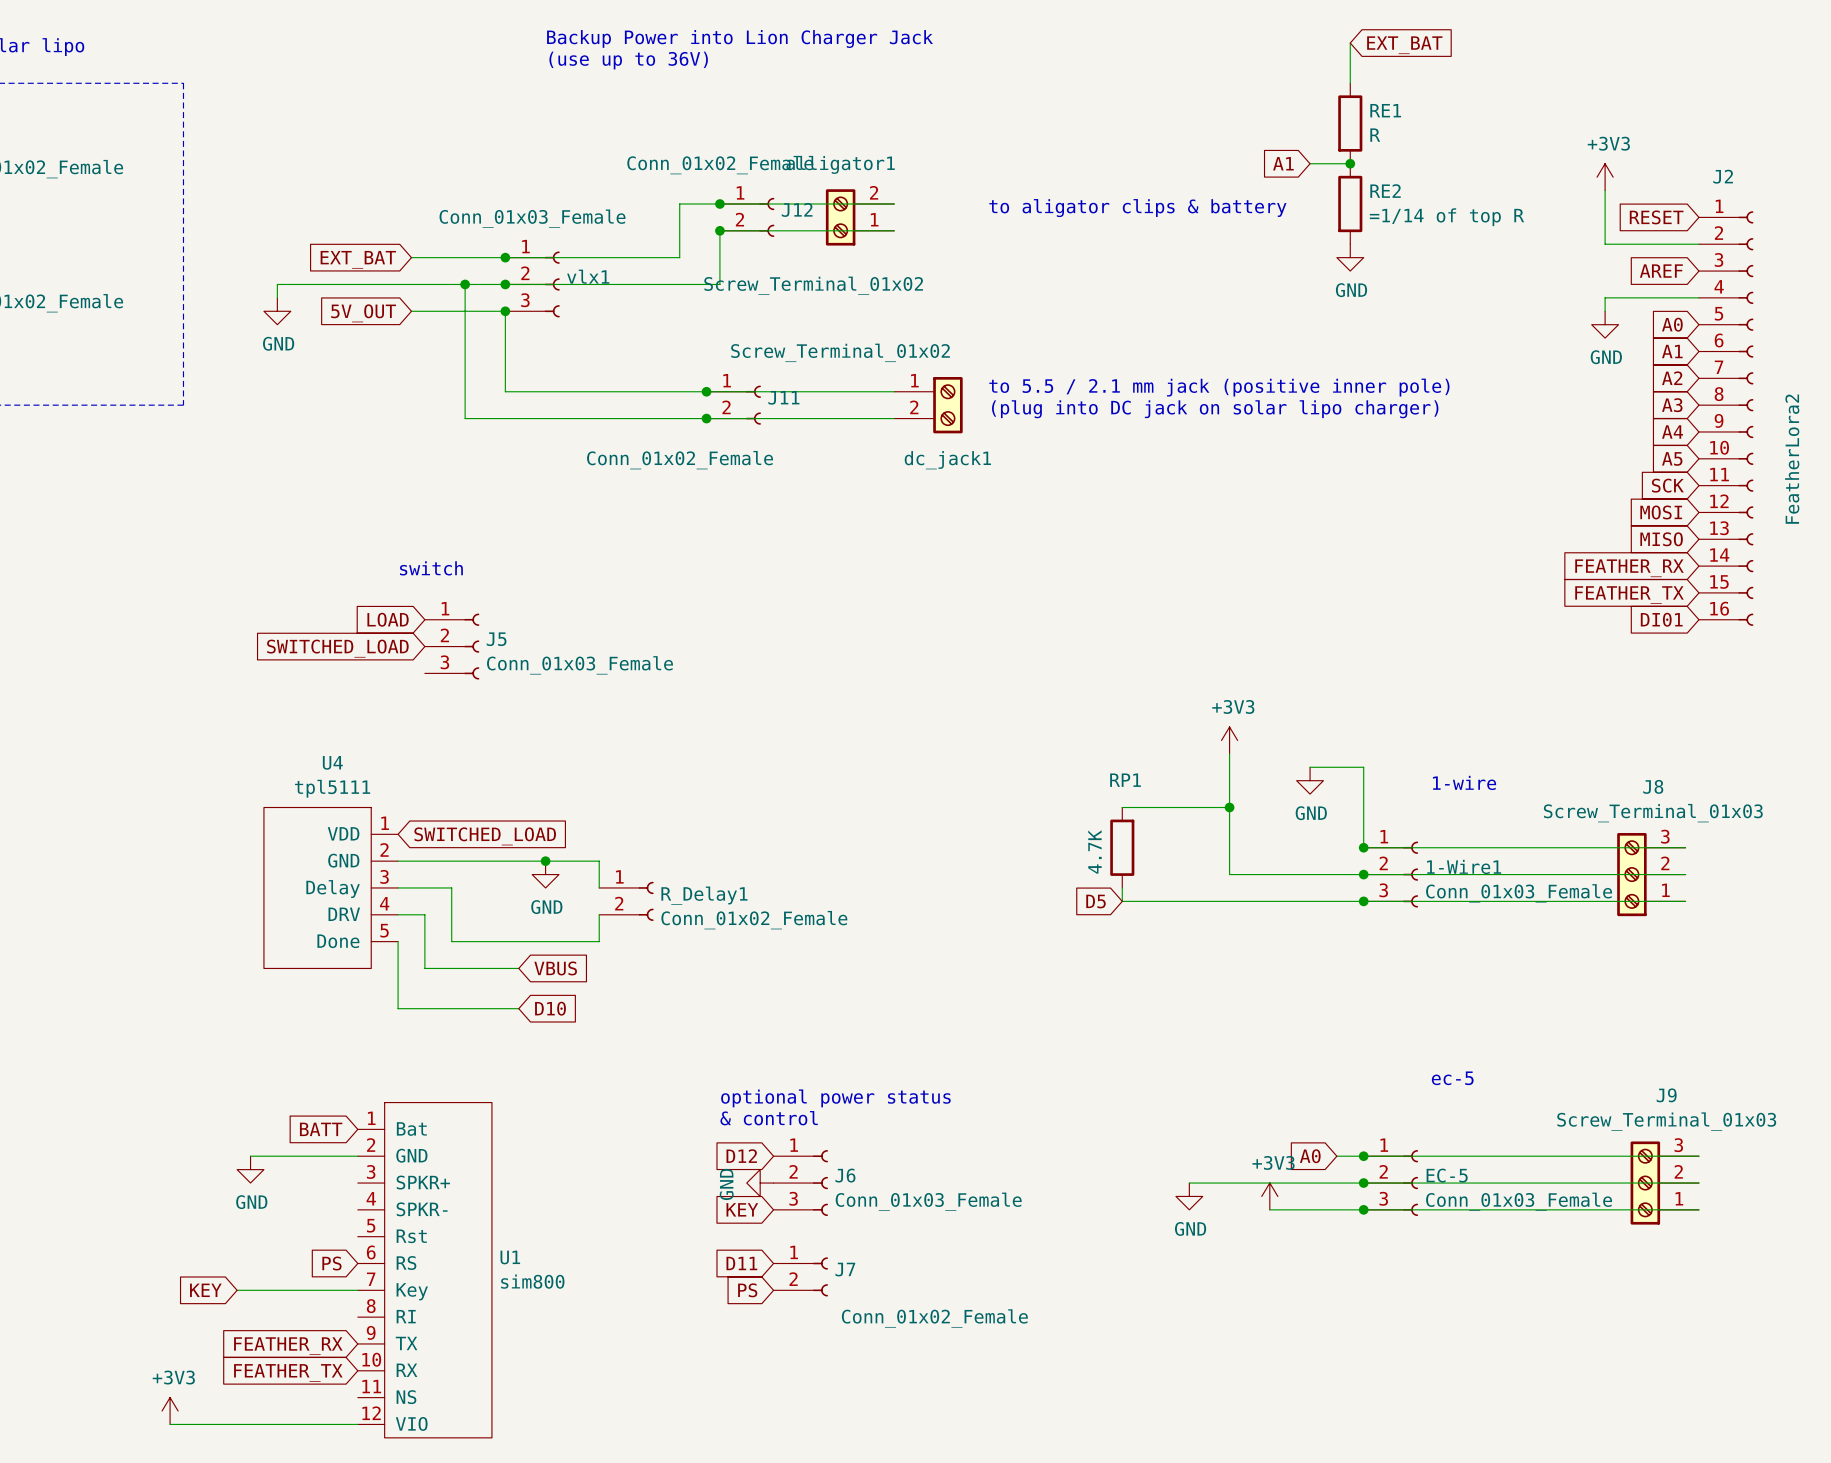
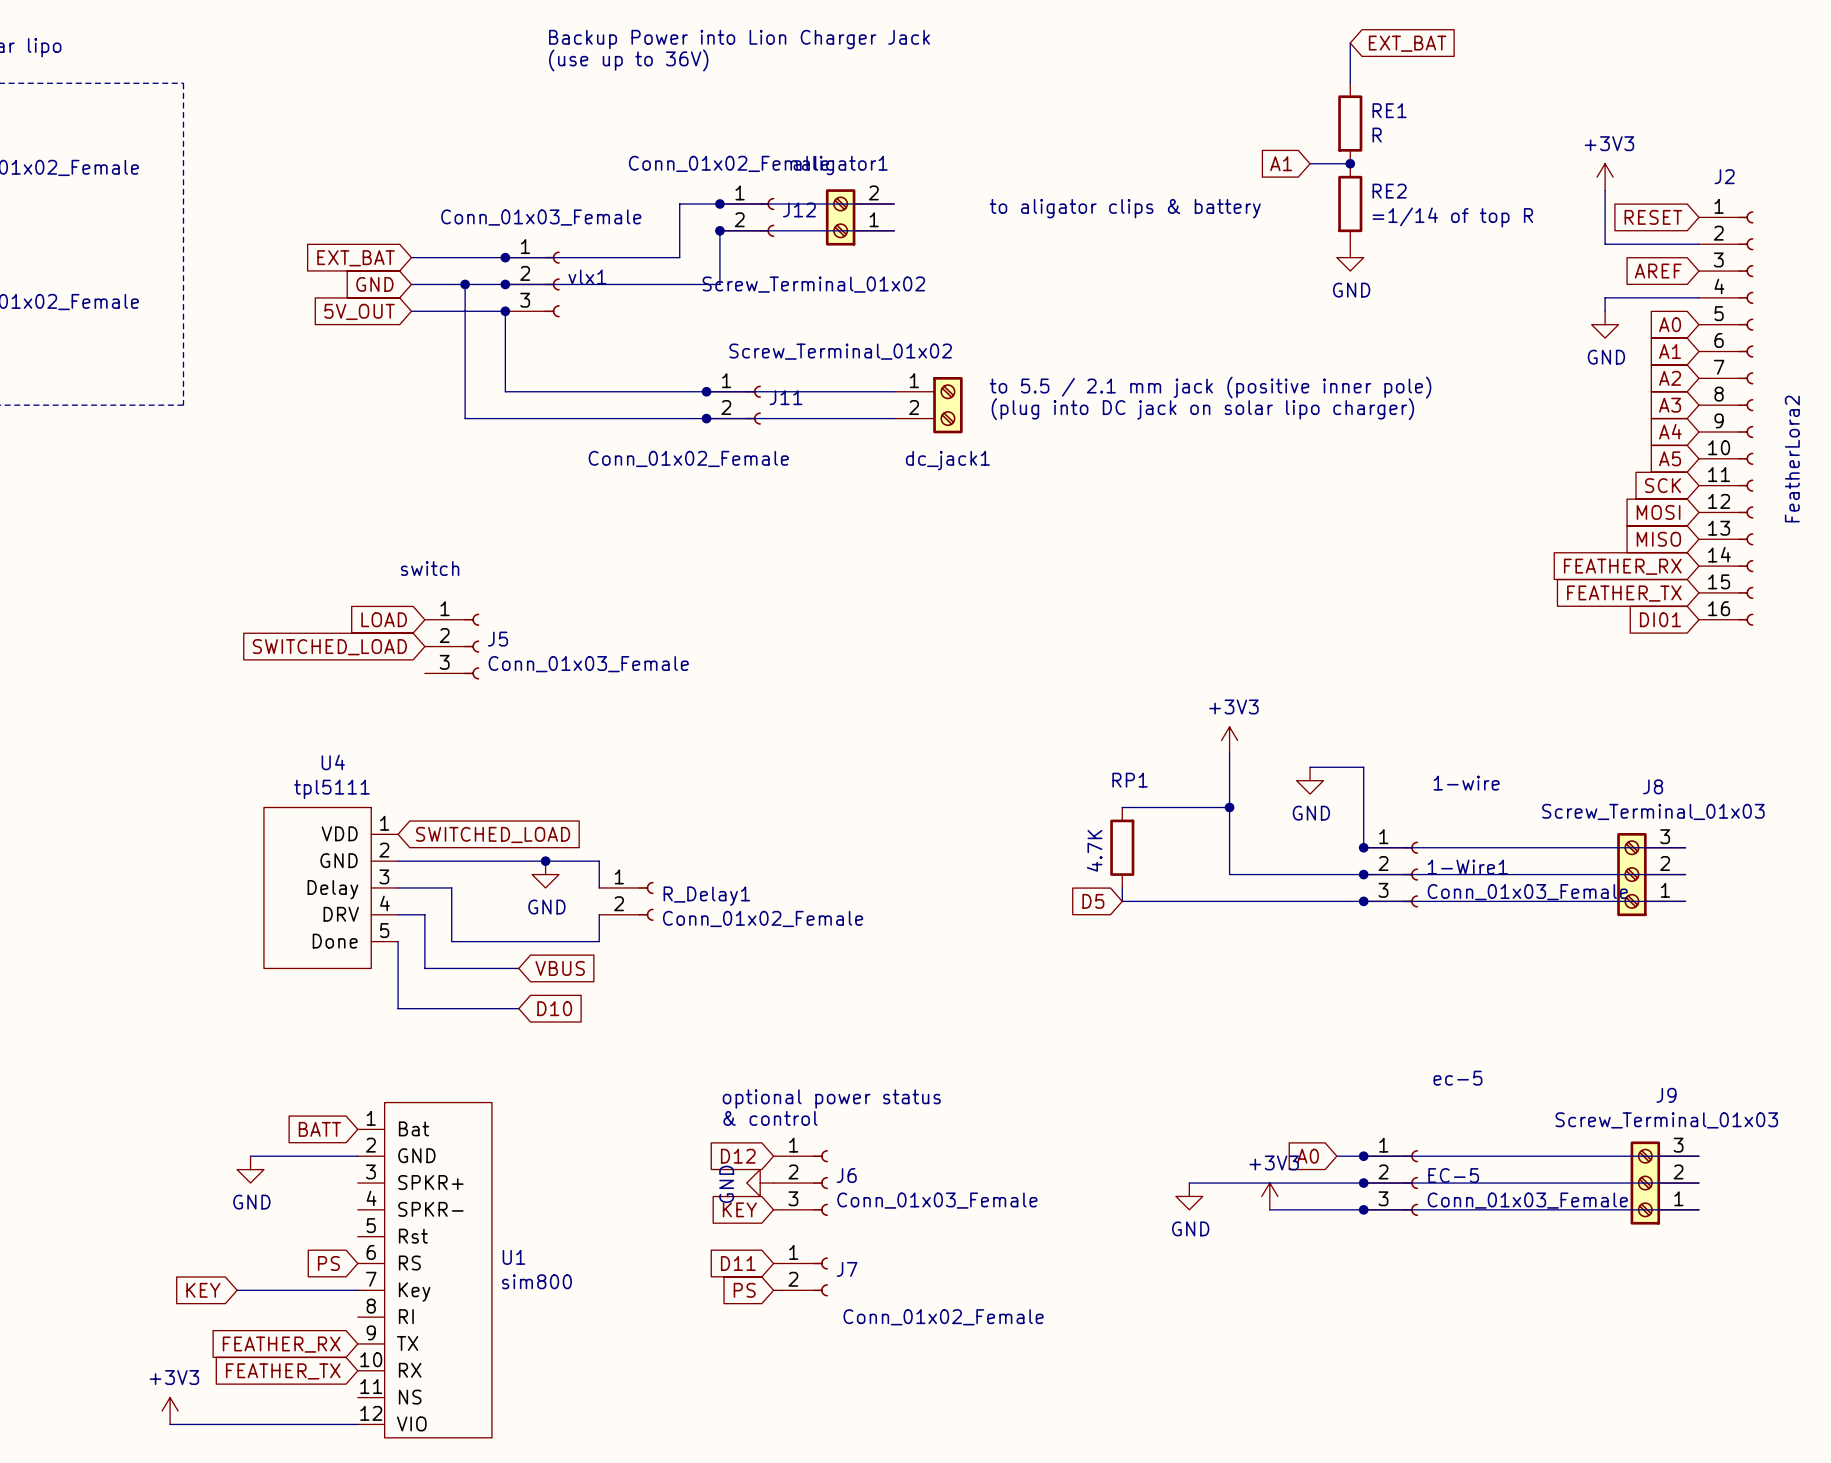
global label: none -> GND (374, 284)
wire: (411, 284) (277, 284) (277, 297) -> none
power symbol: GND (277, 311) -> none

